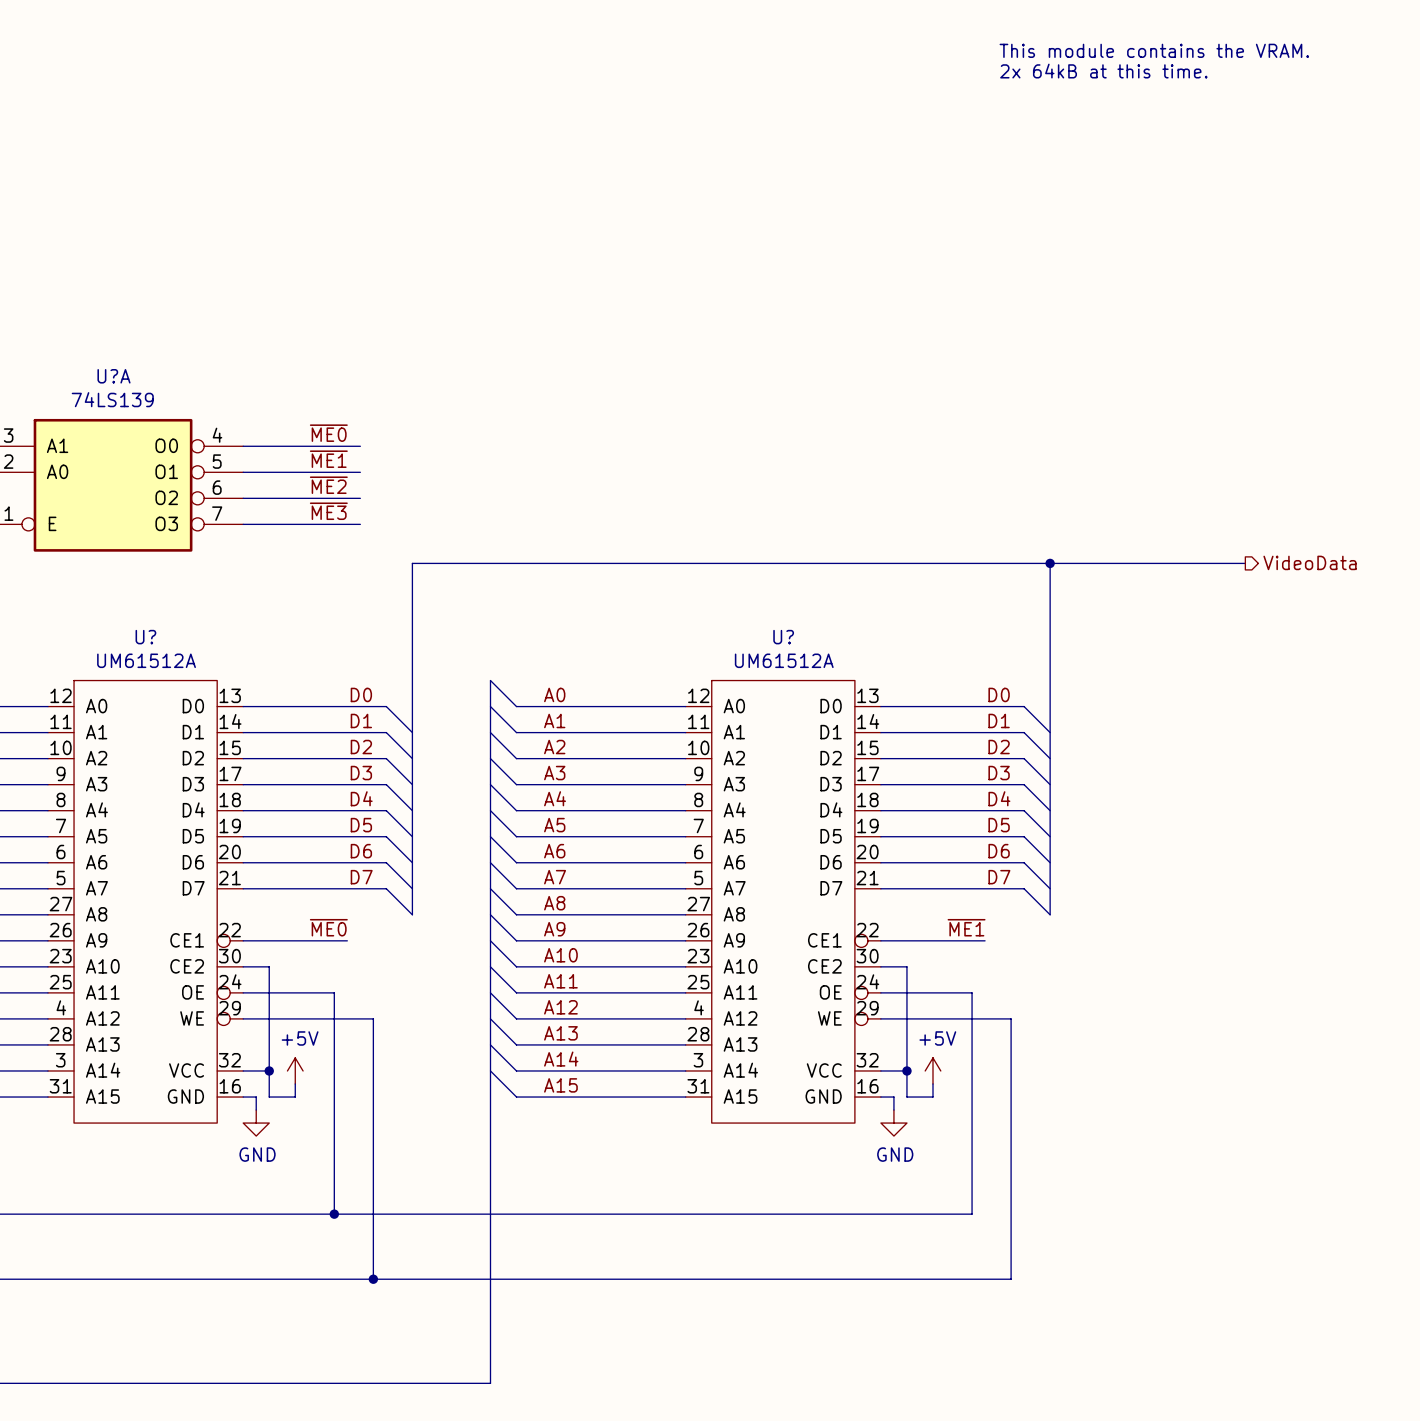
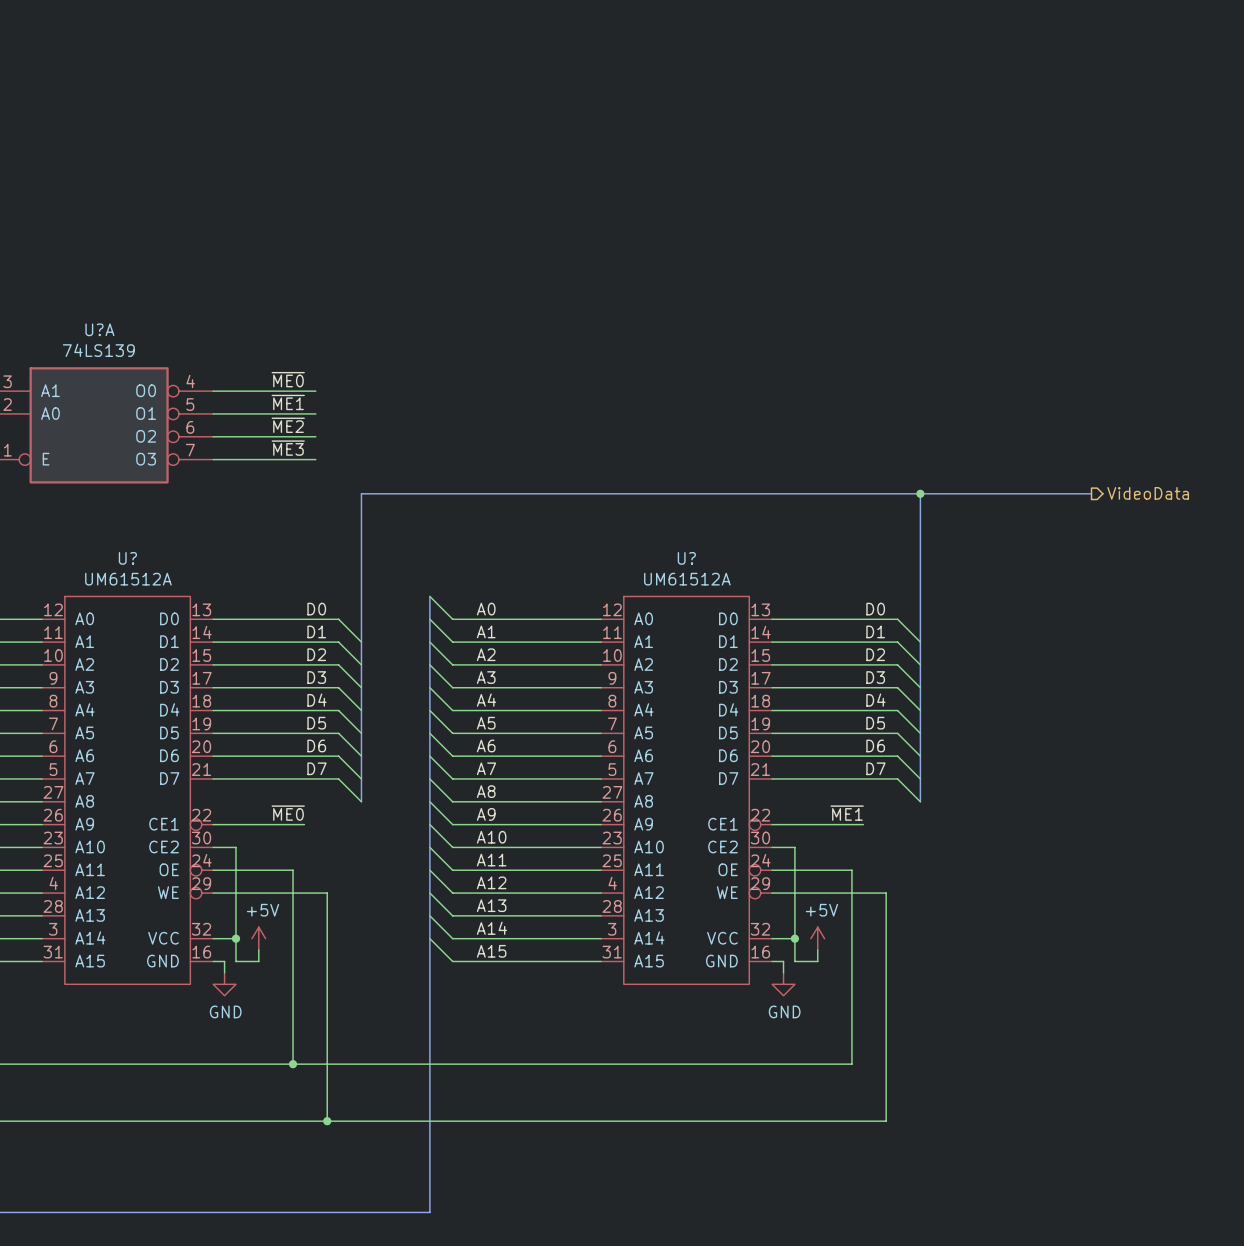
text: This module contains the VRAM. (1154, 50) -> none
text: 2x 64kB at this time. (1103, 71) -> none

